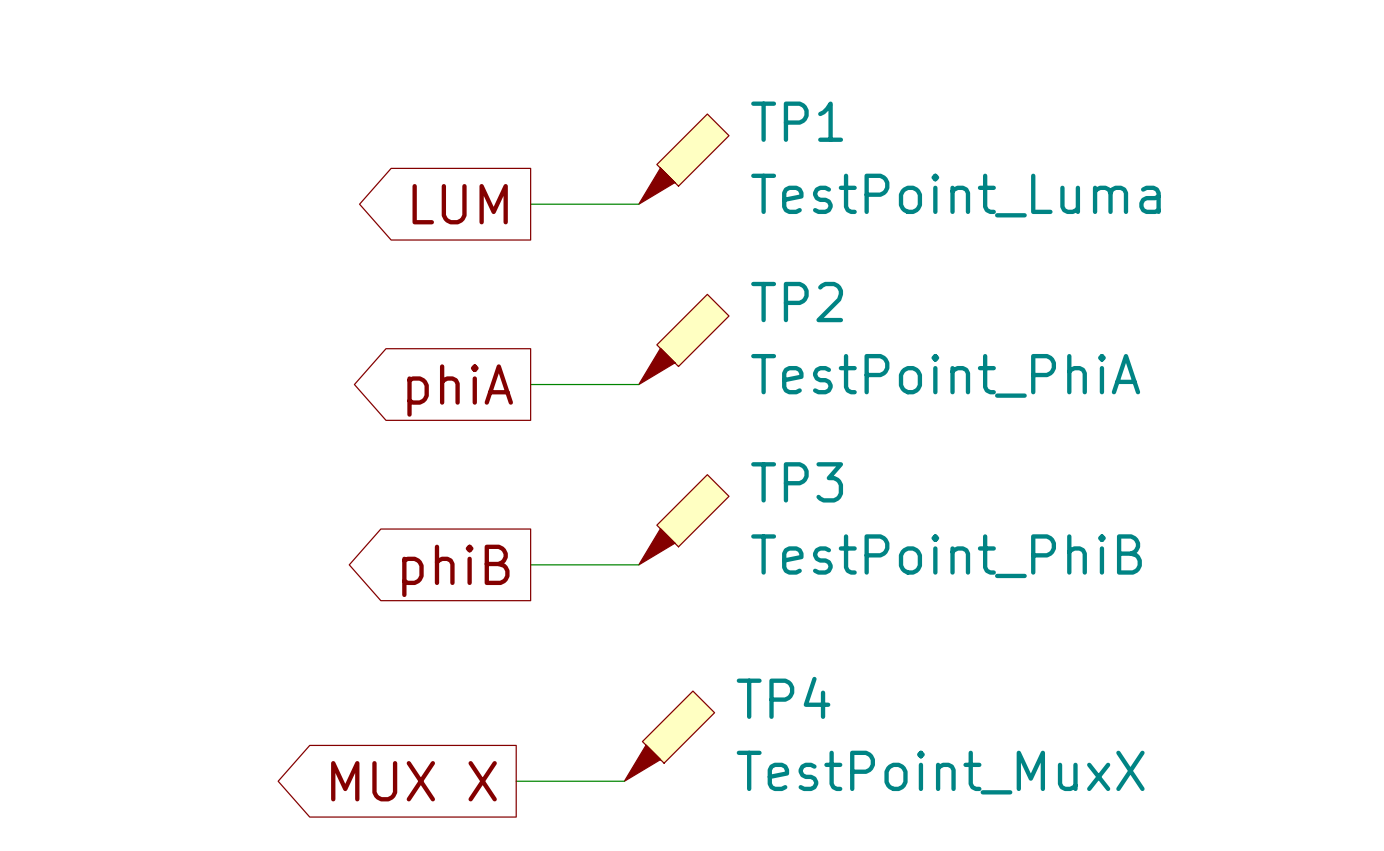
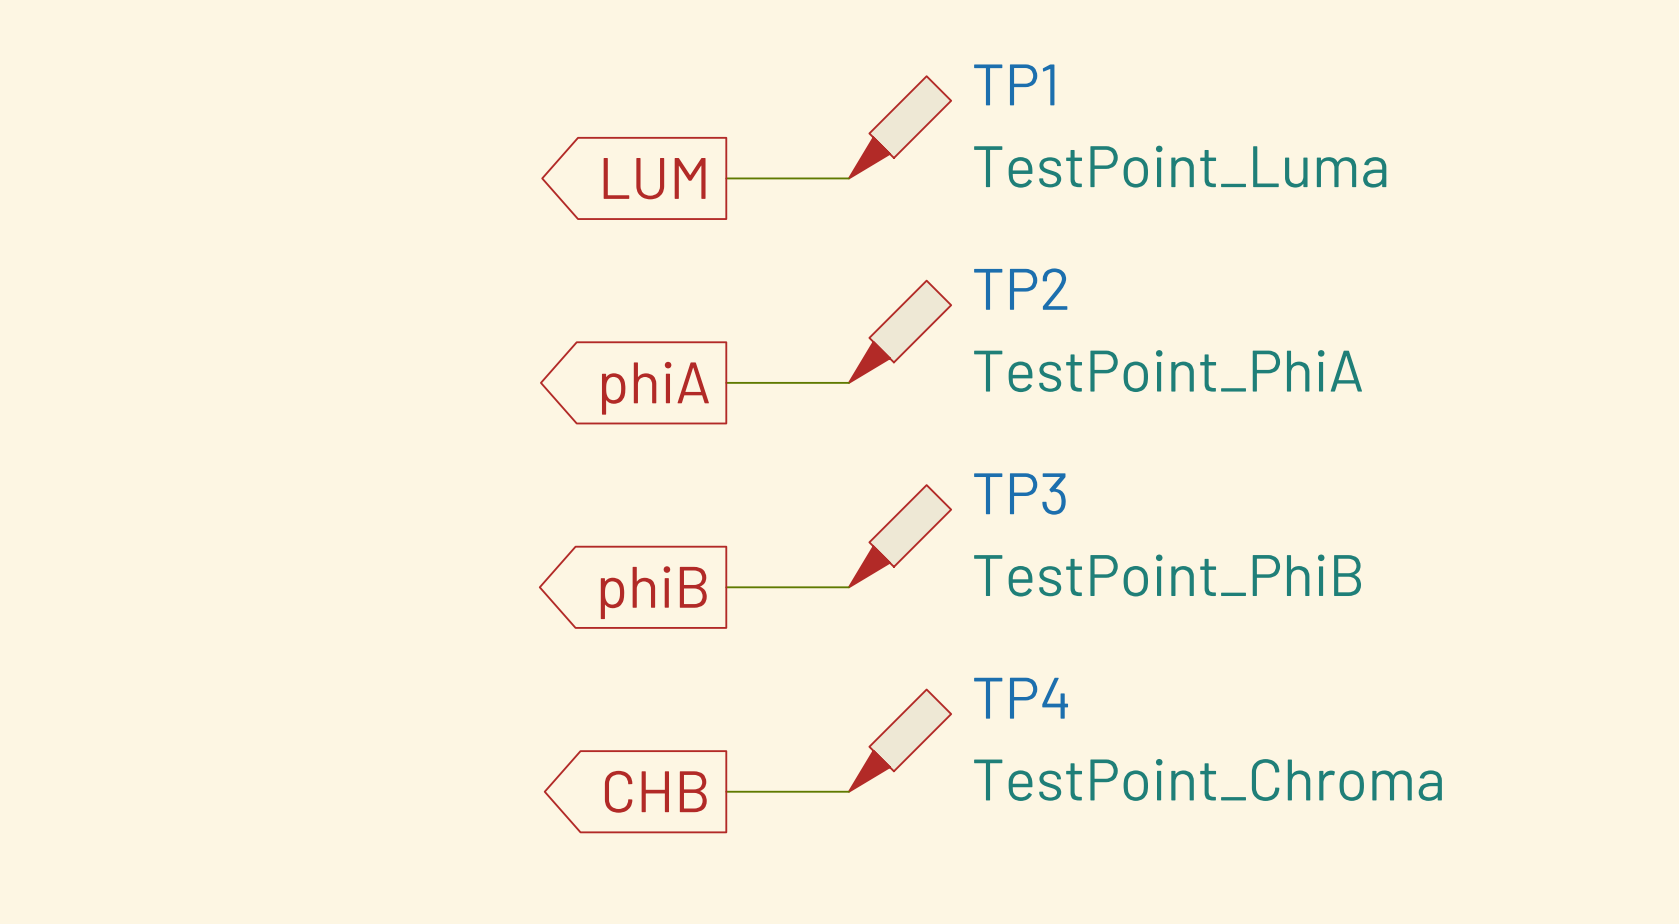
TP4 position: (669, 736) -> (900, 740)
global label: none -> CHB (655, 791)
TP4 value: TestPoint_MuxX (940, 772) -> TestPoint_Chroma (1207, 779)
global label: MUX X (413, 781) -> none
wire: (516, 781) (624, 781) -> (726, 791) (848, 791)

